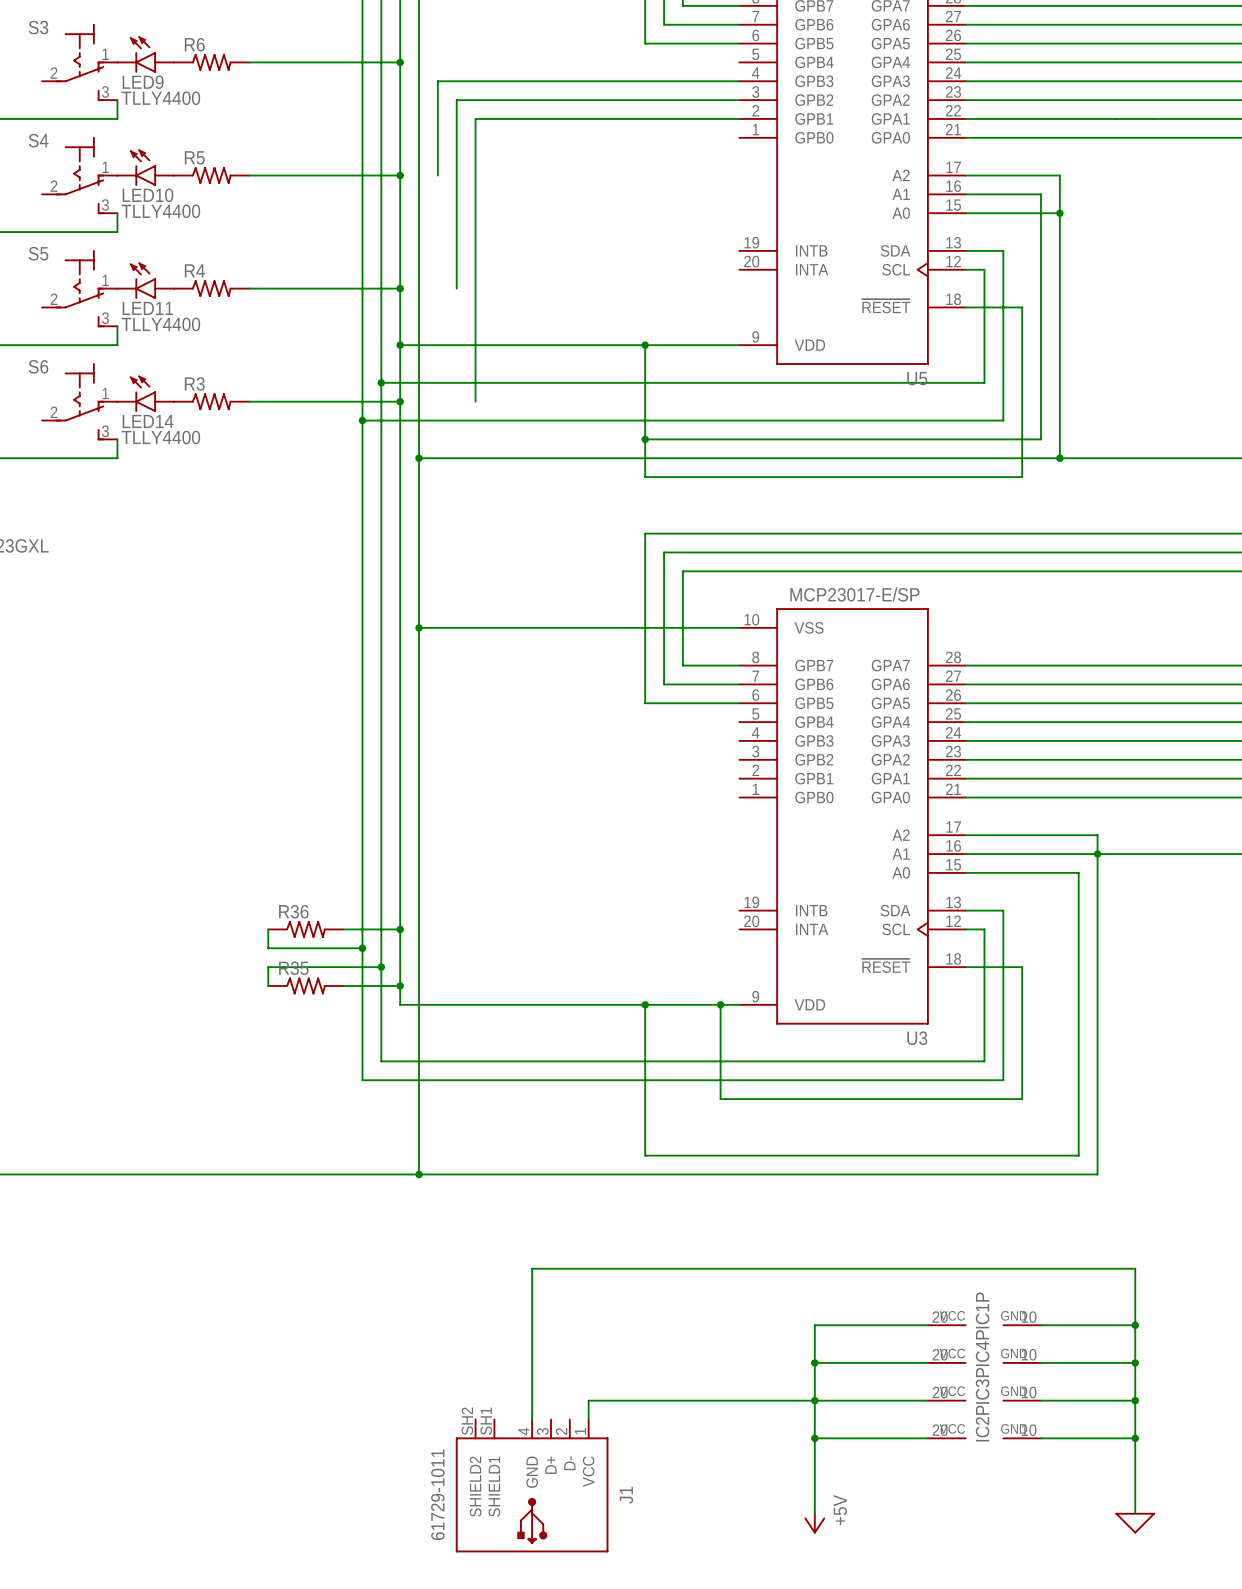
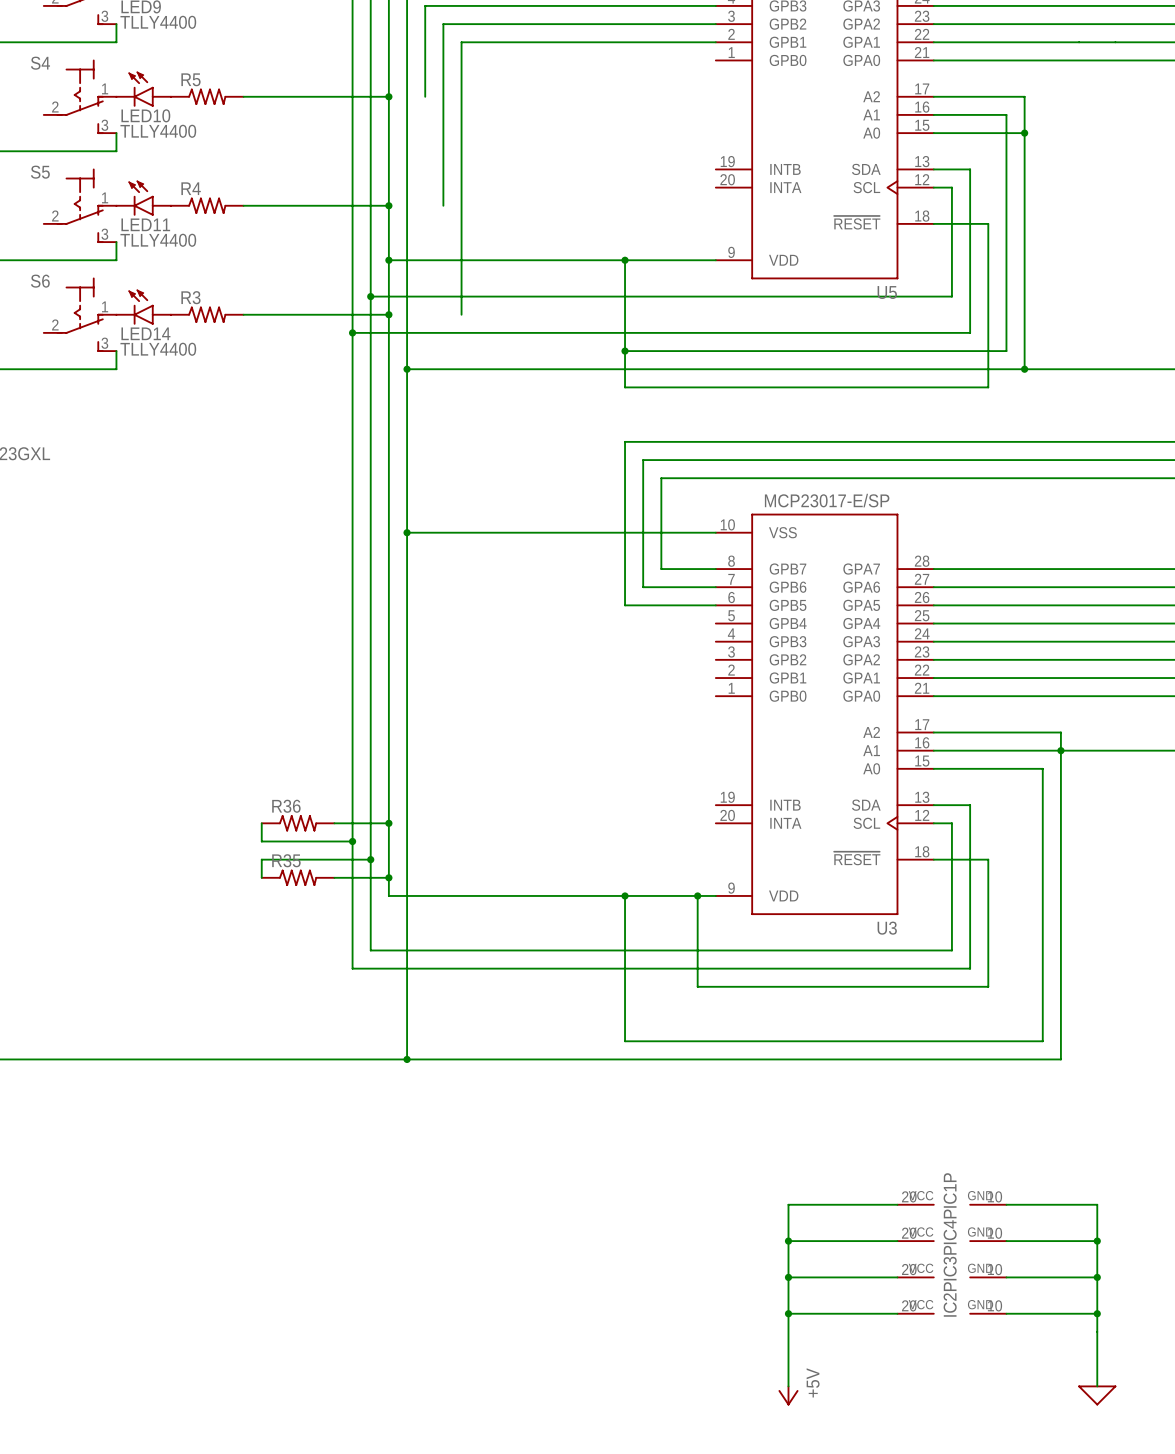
wire: (1135, 1325) (1135, 1268) (532, 1268) (532, 1419) -> none
junction: (1135, 1325) -> none
wire: (814, 1400) (588, 1400) (588, 1419) -> none
J1: 61729-1011 (532, 1485) -> none

